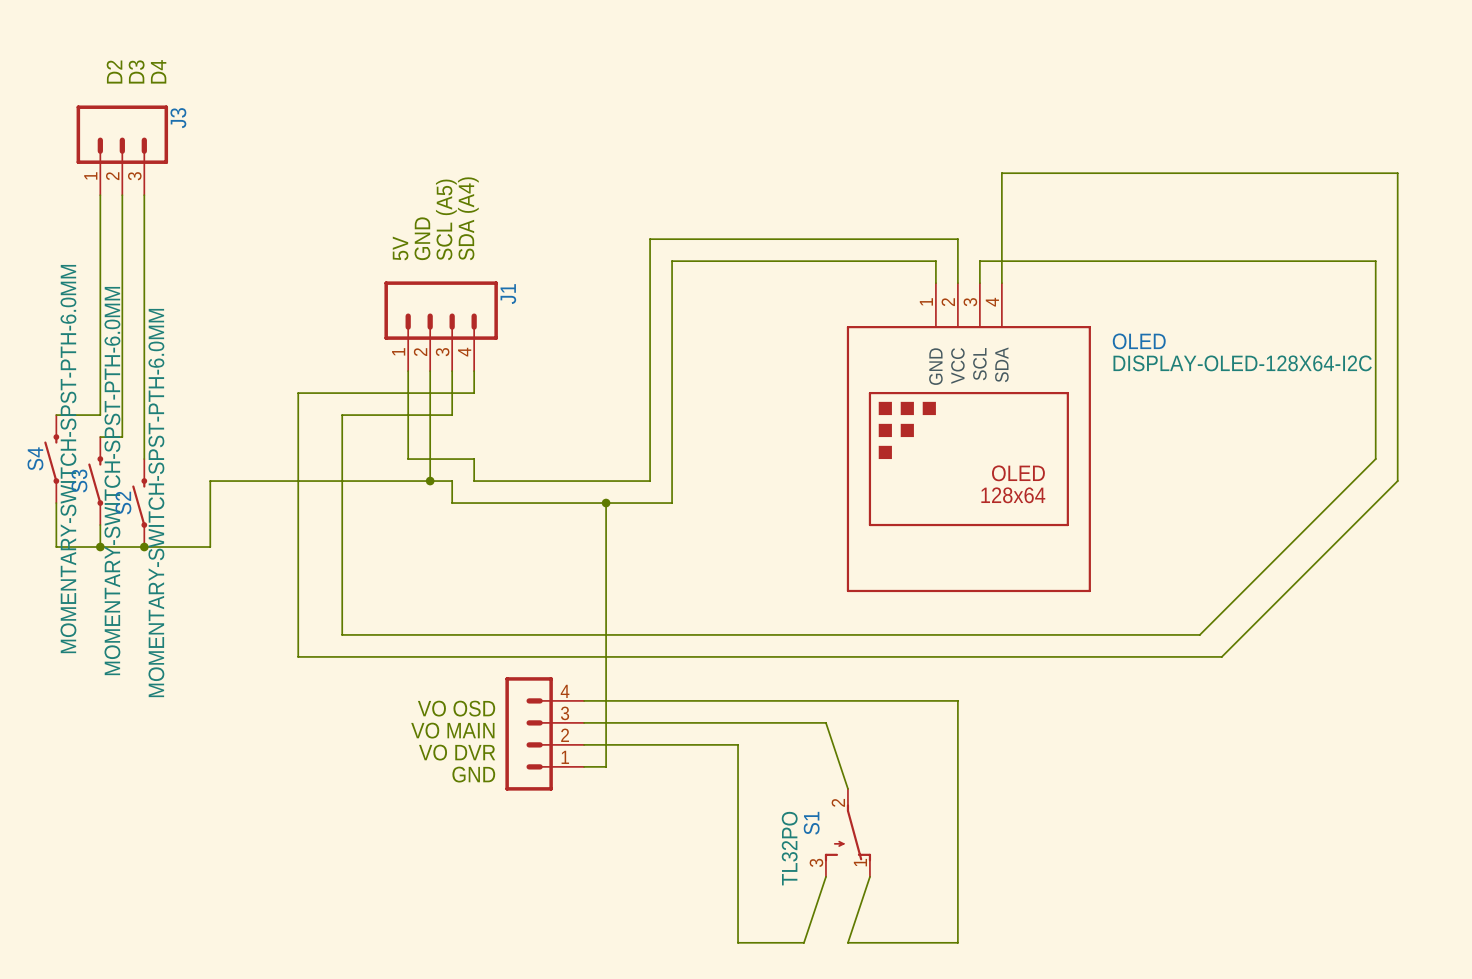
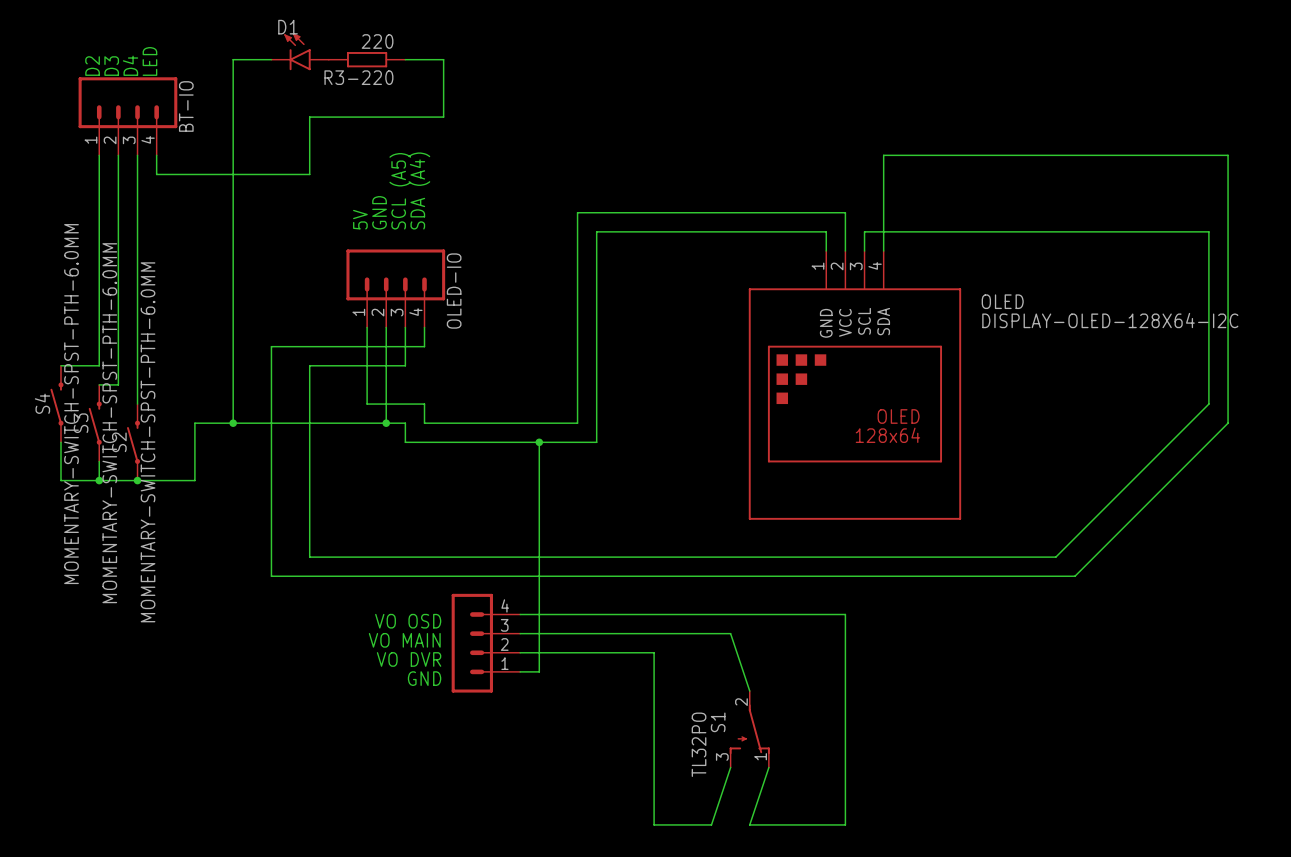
D1: none -> (300, 51)
wire: none -> (271, 59) (233, 59) (233, 423)
R3-220: none -> 220 (367, 59)
wire: none -> (405, 59) (443, 59) (443, 117) (309, 117) (309, 174) (156, 174) (156, 155)
text: D3 (136, 71) -> D4 (130, 65)
text: D4 (158, 71) -> LED (149, 61)
text: none -> D2 (92, 66)
text: D2 (114, 72) -> D3 (111, 66)
BT-IO: none -> (127, 116)
J3: (122, 150) -> none
J1 name: J1 (508, 294) -> OLED-IO (454, 291)
junction: none -> (233, 423)

